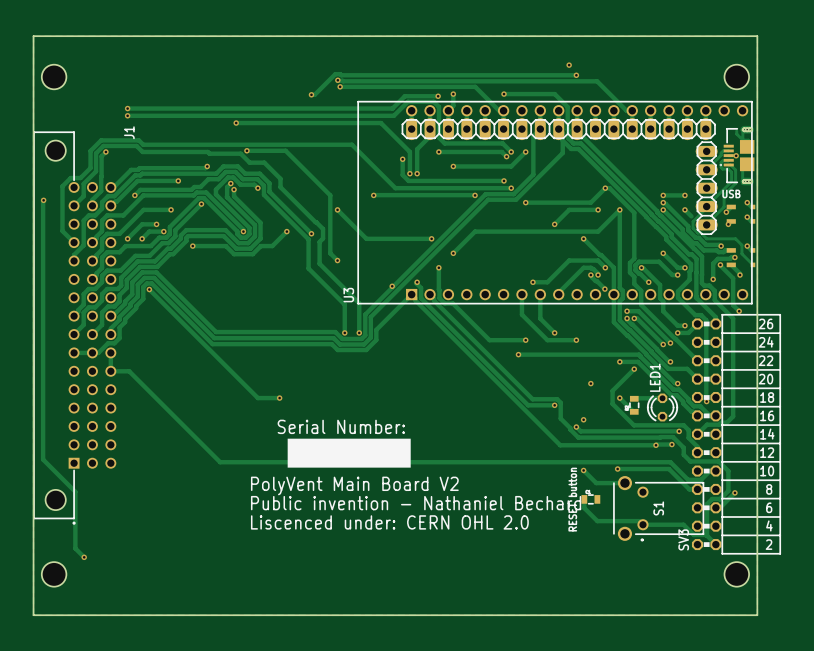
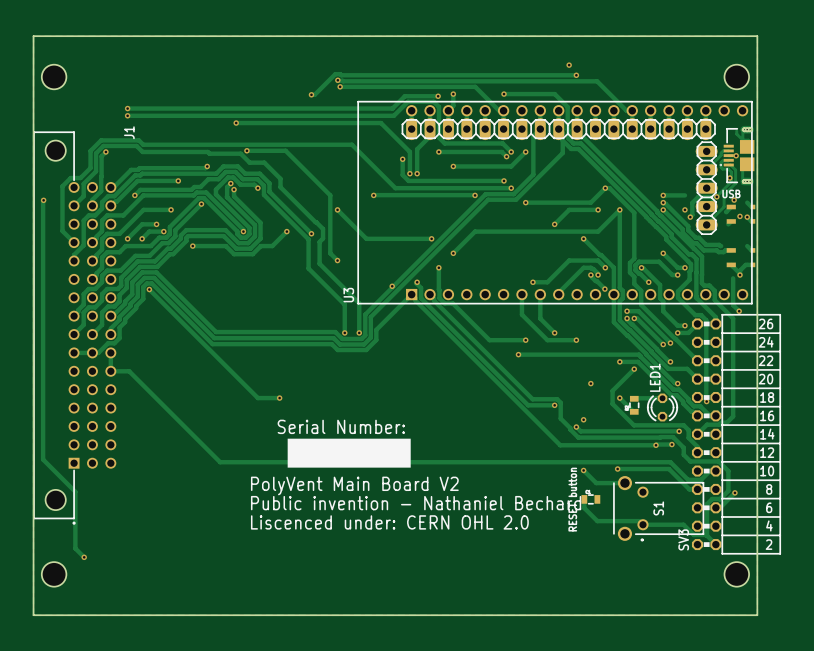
via: none -> (729, 178)
via: (684, 195) -> none
track: none -> (716, 196) (698, 197) (692, 202) (692, 215) (690, 217)
via: none -> (716, 196)
via: none -> (734, 200)
via: (747, 202) -> none
track: (706, 206) (693, 221) (693, 228) (706, 238) (735, 238) (741, 245) (741, 253) (753, 264) -> (740, 273) (740, 270) (745, 264) (753, 264)
track: (684, 209) (691, 216) -> none
via: (726, 212) -> none
via: none -> (739, 216)
via: none -> (690, 217)
via: (728, 224) -> none
via: (721, 246) -> none
via: (747, 246) -> none
track: (734, 257) (717, 258) (713, 263) (713, 279) -> none
via: (734, 257) -> none
track: (720, 264) (733, 278) -> none
via: (720, 264) -> none
via: (713, 279) -> none

